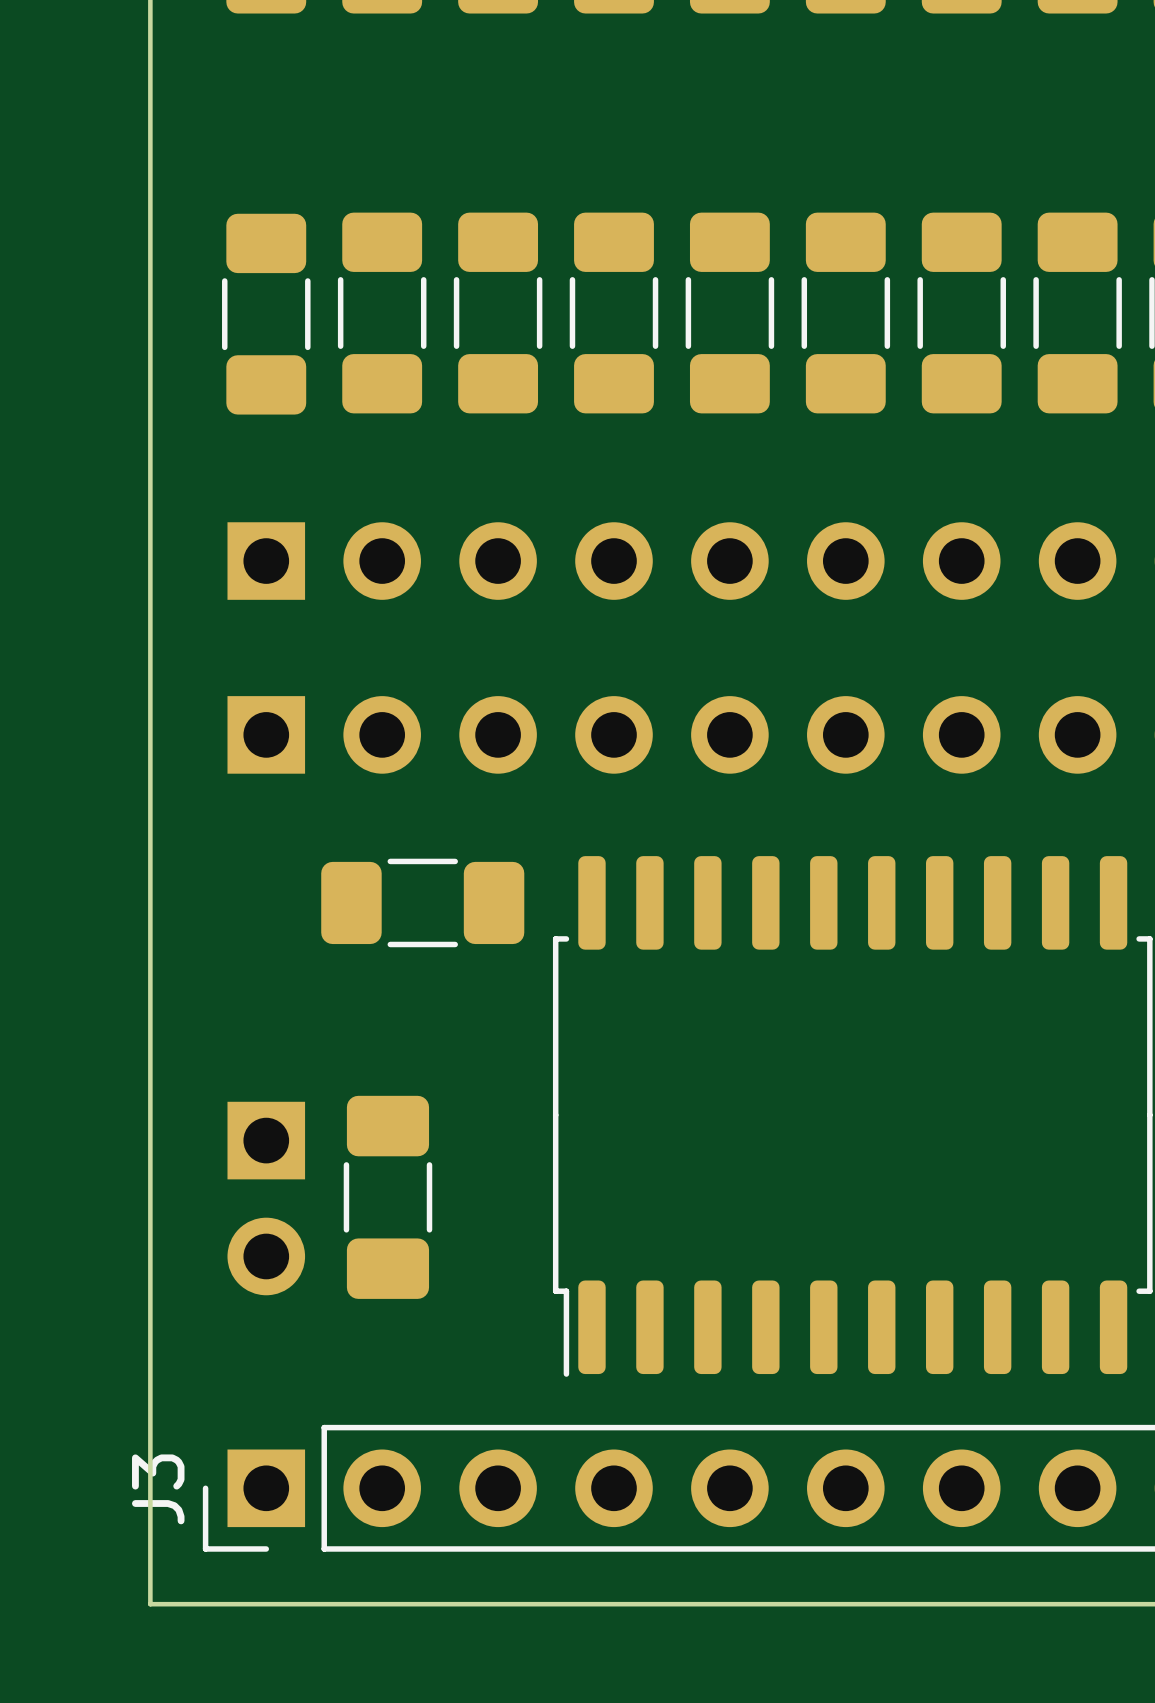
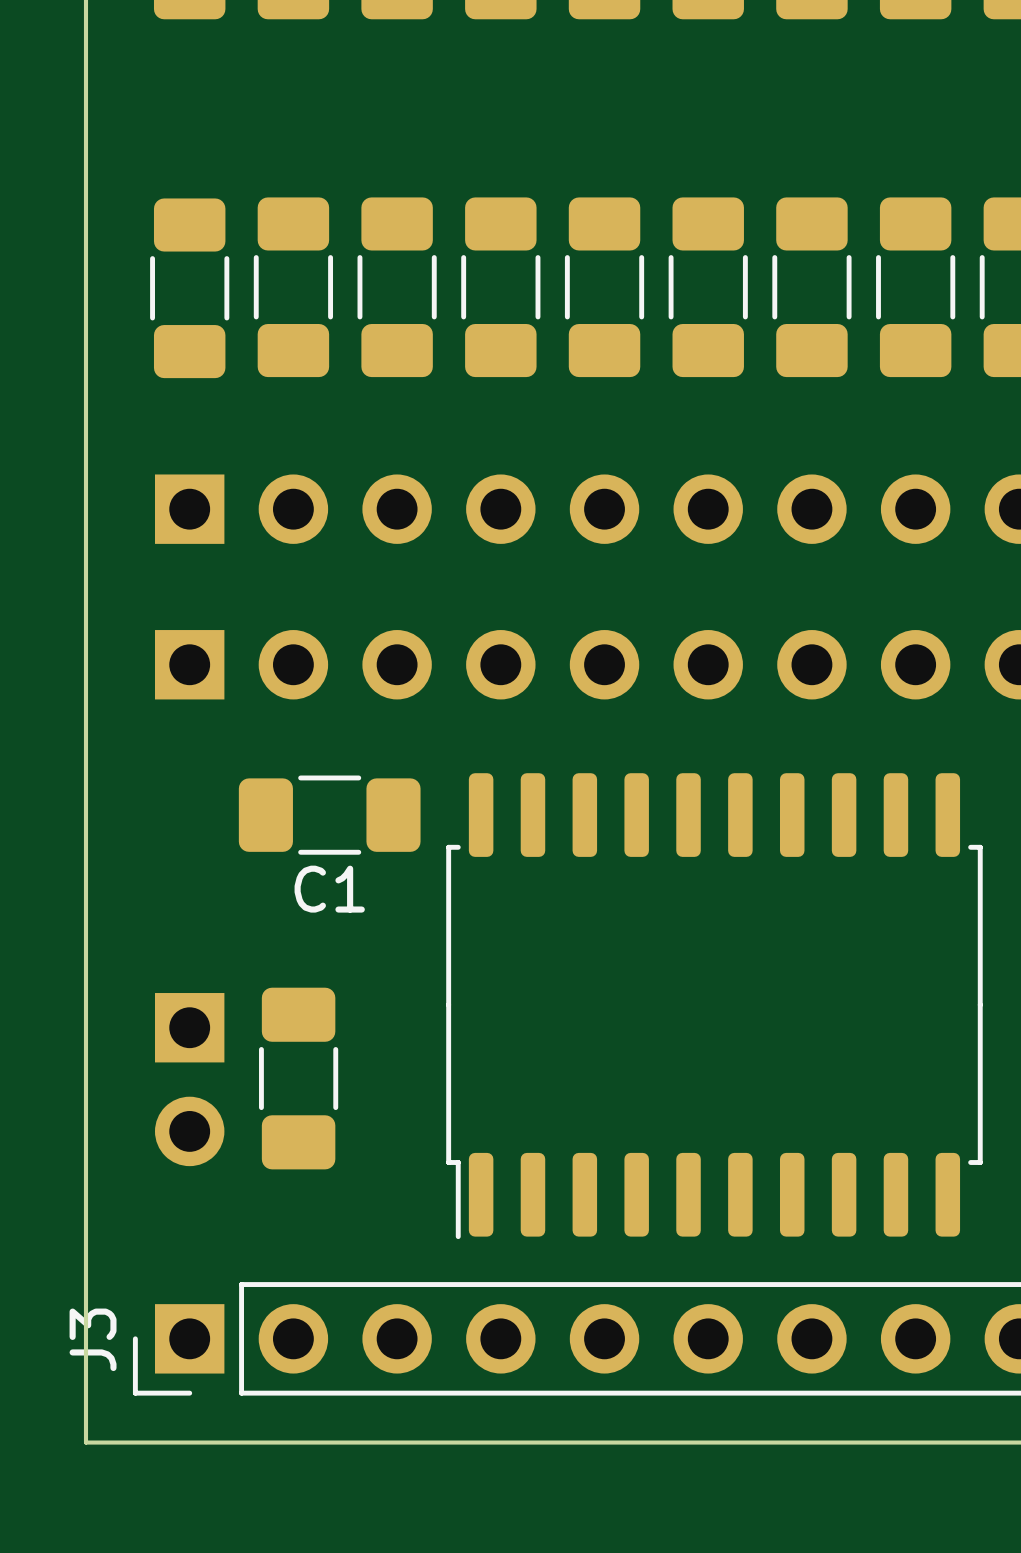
C1 name: none -> C1 (329, 889)

